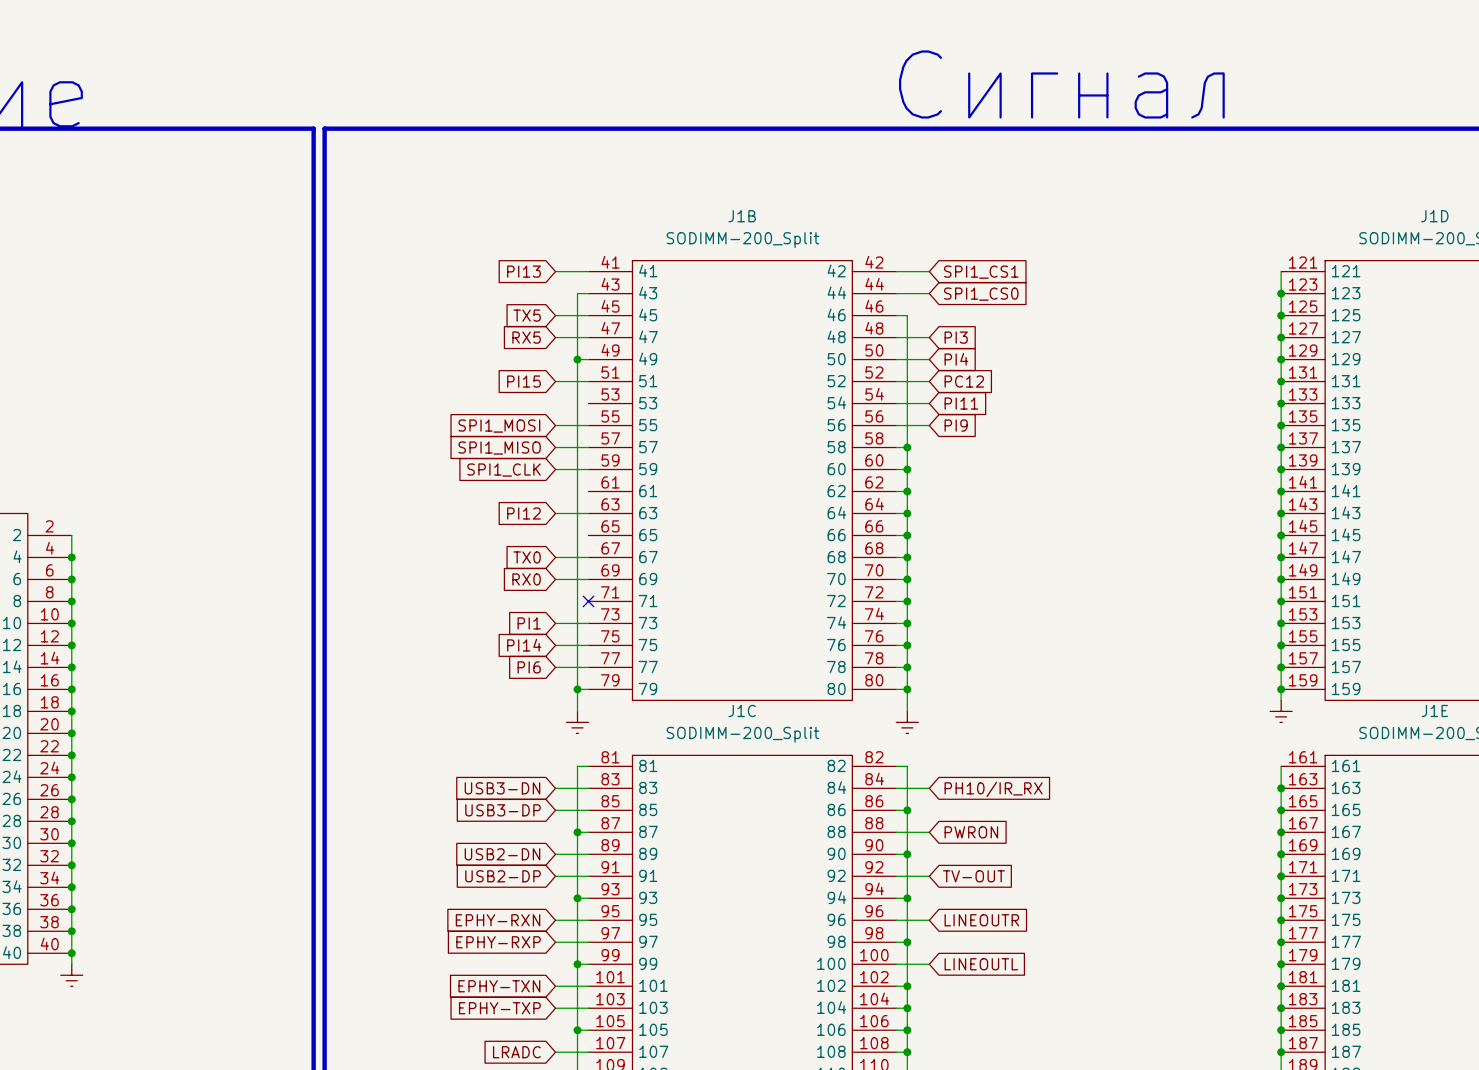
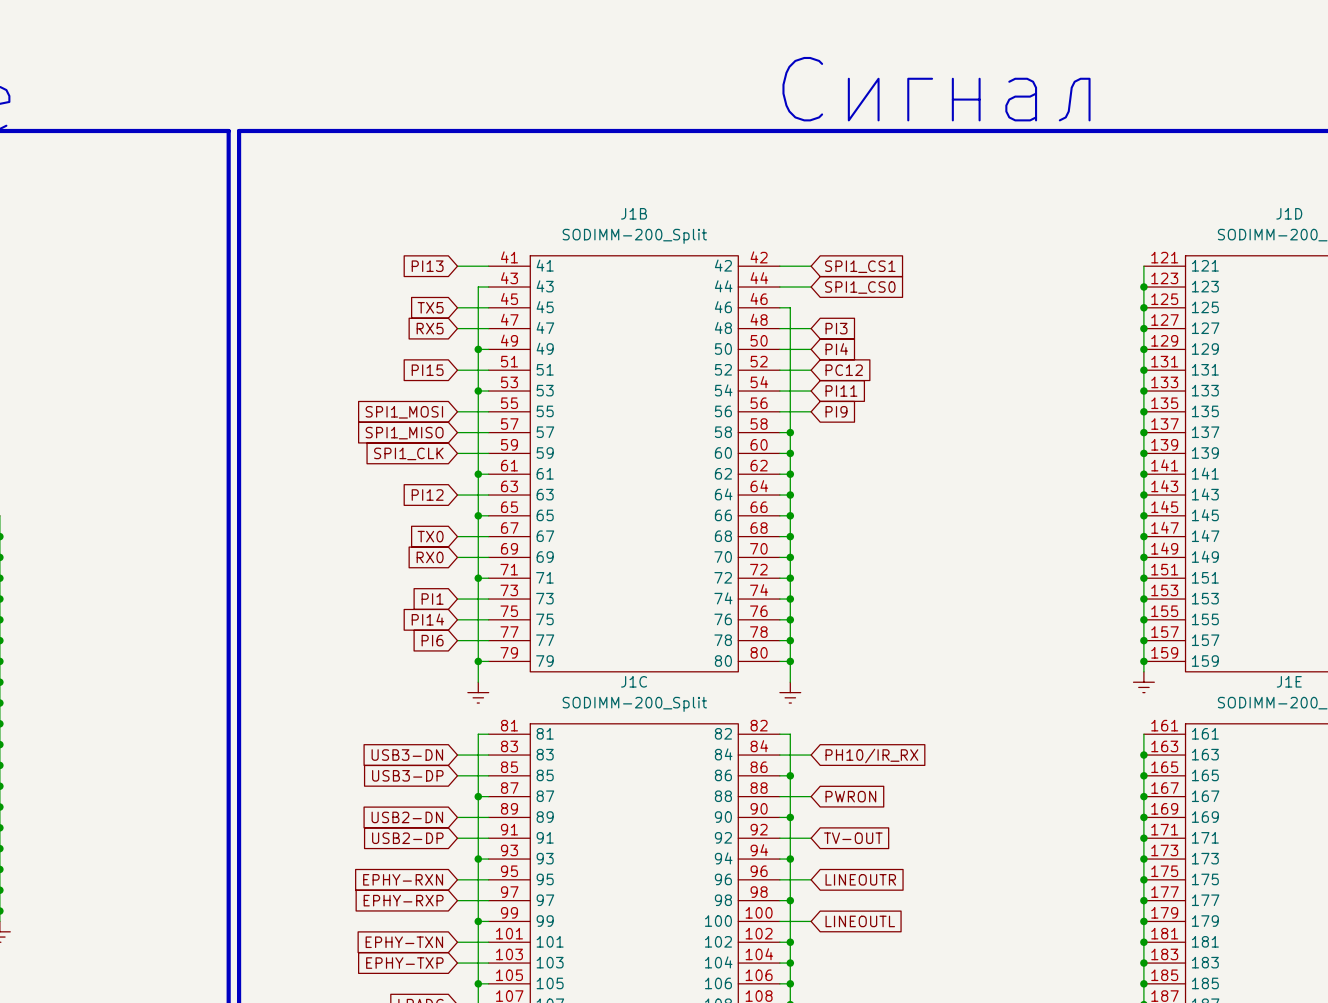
wire: none -> (478, 391) (488, 391)
junction: none -> (478, 391)
wire: none -> (478, 474) (488, 474)
junction: none -> (478, 474)
wire: none -> (478, 515) (488, 515)
junction: none -> (478, 515)
wire: none -> (478, 578) (488, 578)
junction: none -> (478, 578)
no-connect mark: (588, 601) -> none

